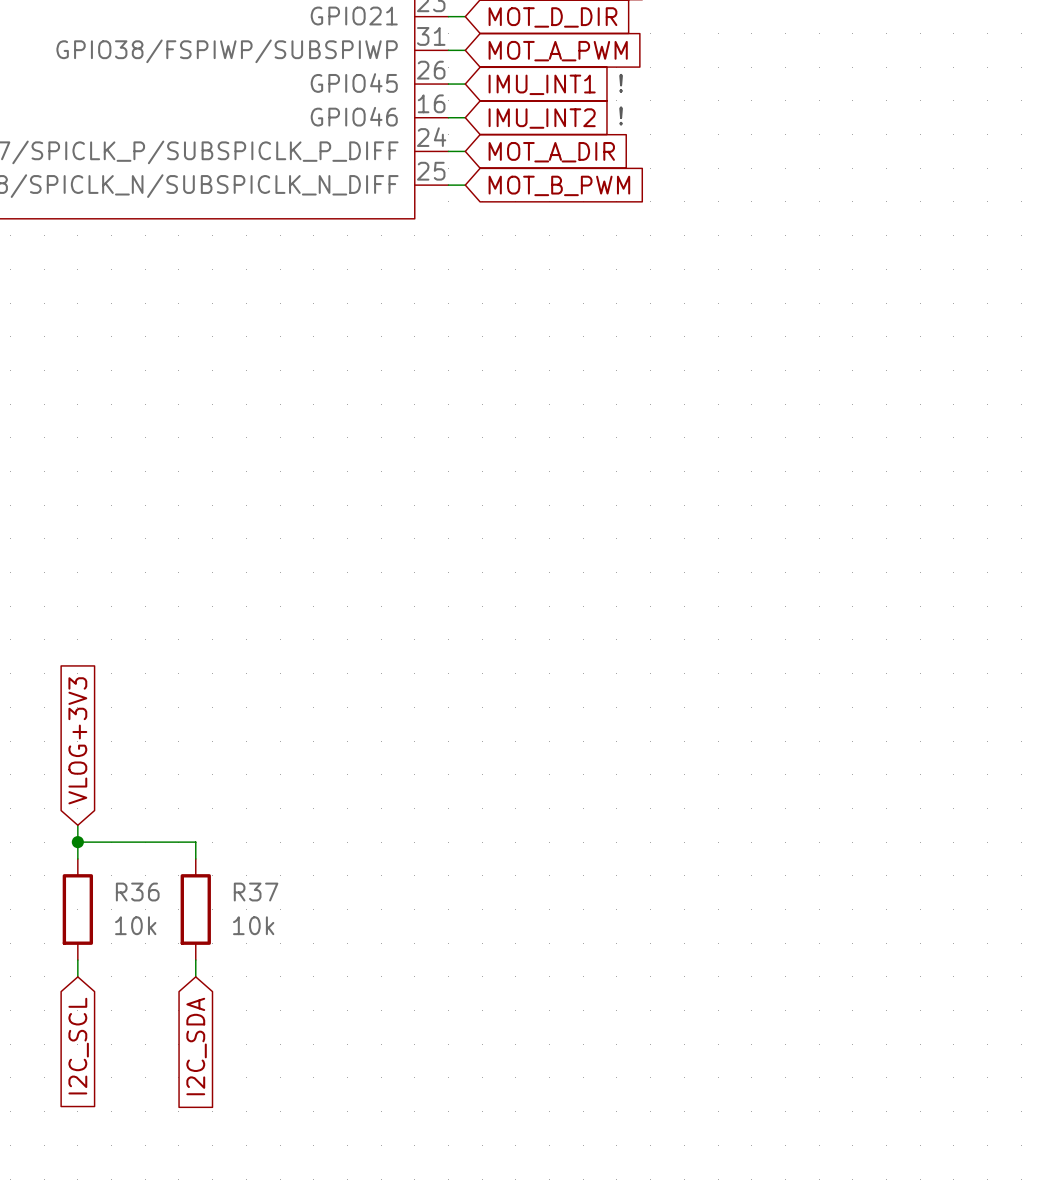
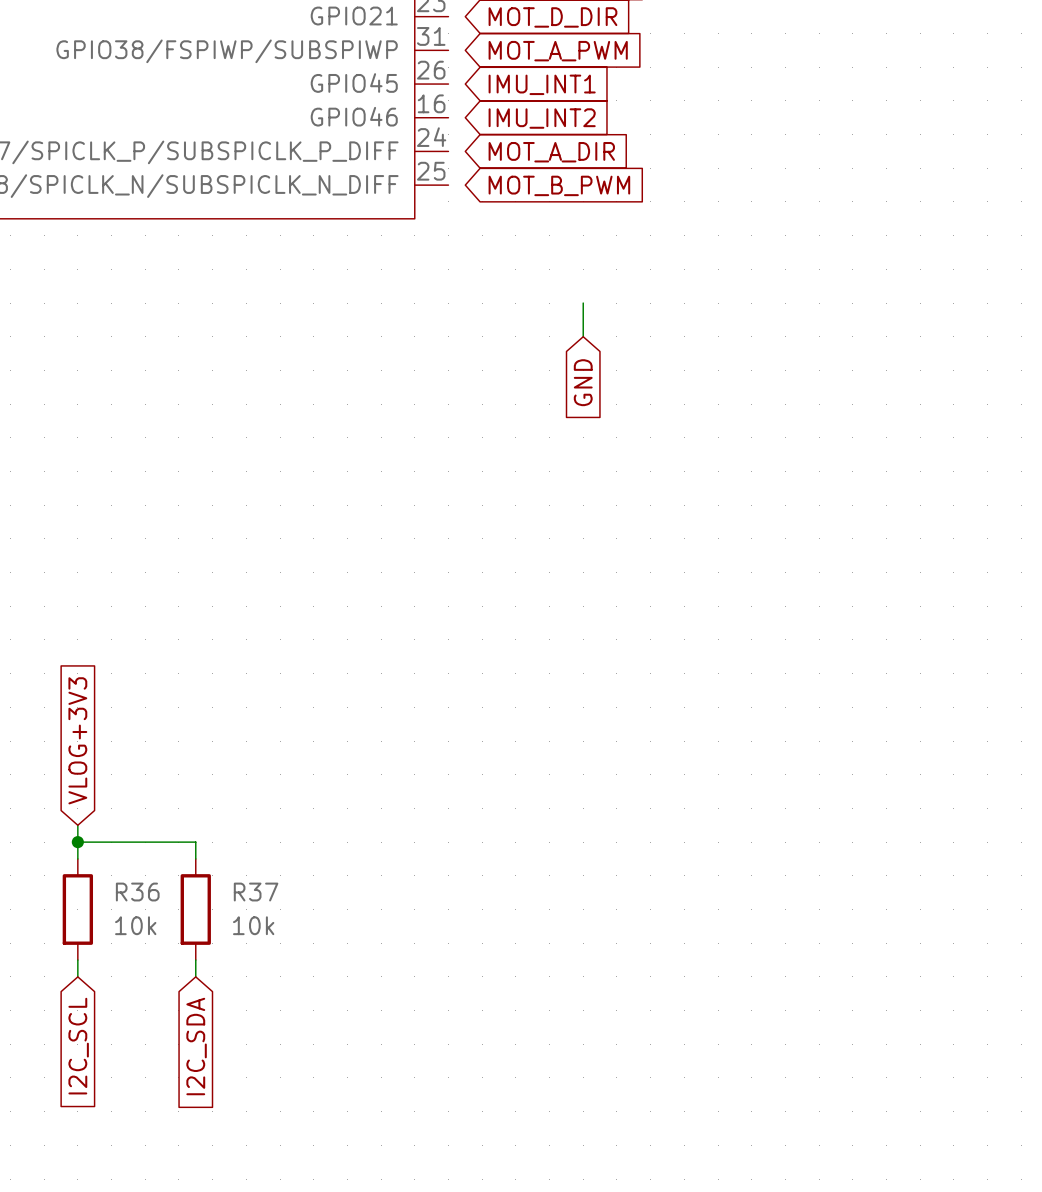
wire: (448, 16) (465, 16) -> none
wire: (448, 50) (465, 50) -> none
text: ! (621, 83) -> none
wire: (448, 84) (465, 84) -> none
text: ! (621, 116) -> none
wire: (448, 117) (465, 117) -> none
wire: (448, 151) (465, 151) -> none
wire: (448, 185) (465, 185) -> none
wire: none -> (583, 303) (583, 336)
global label: none -> GND (583, 382)

